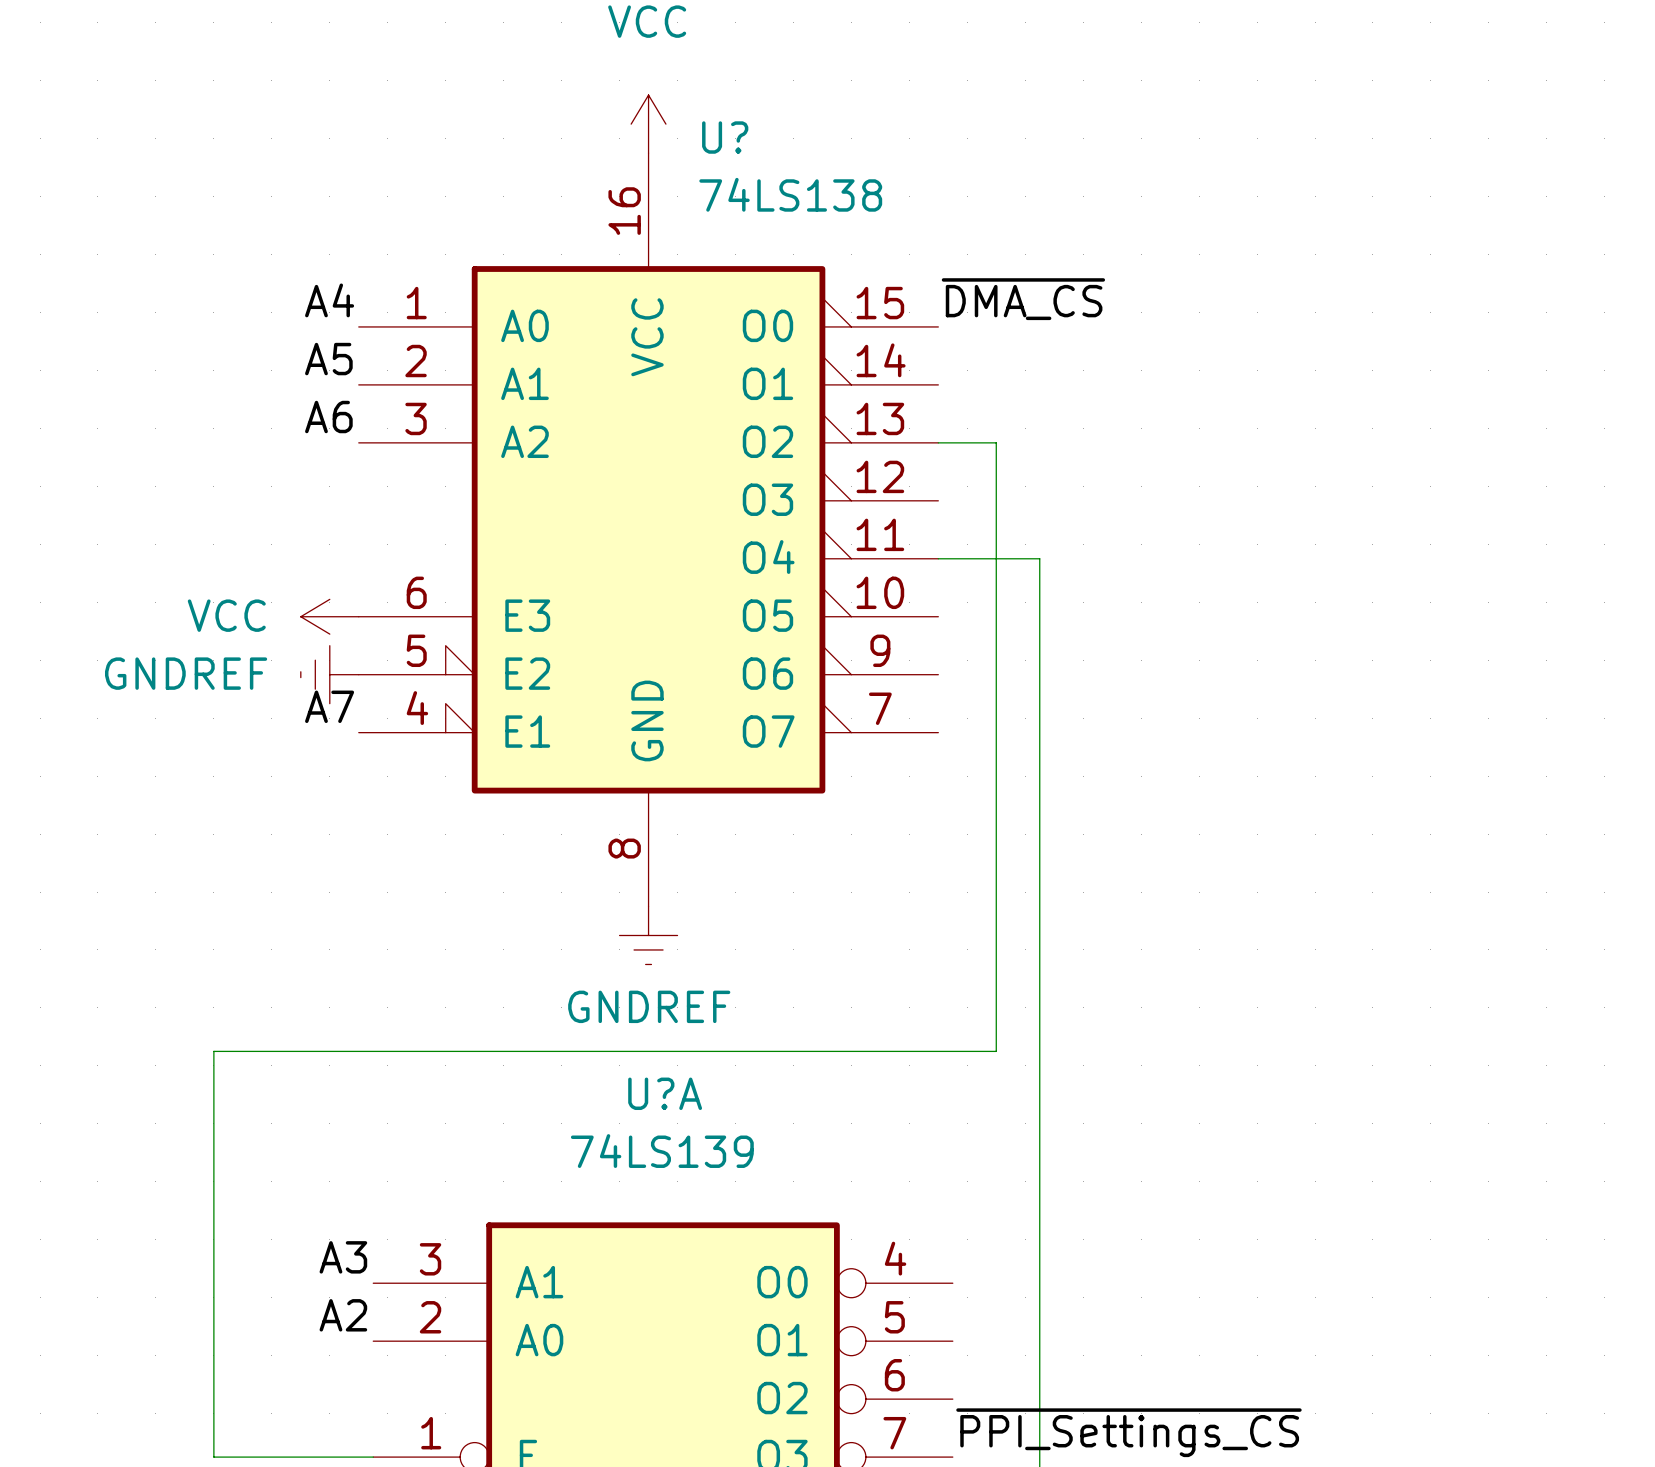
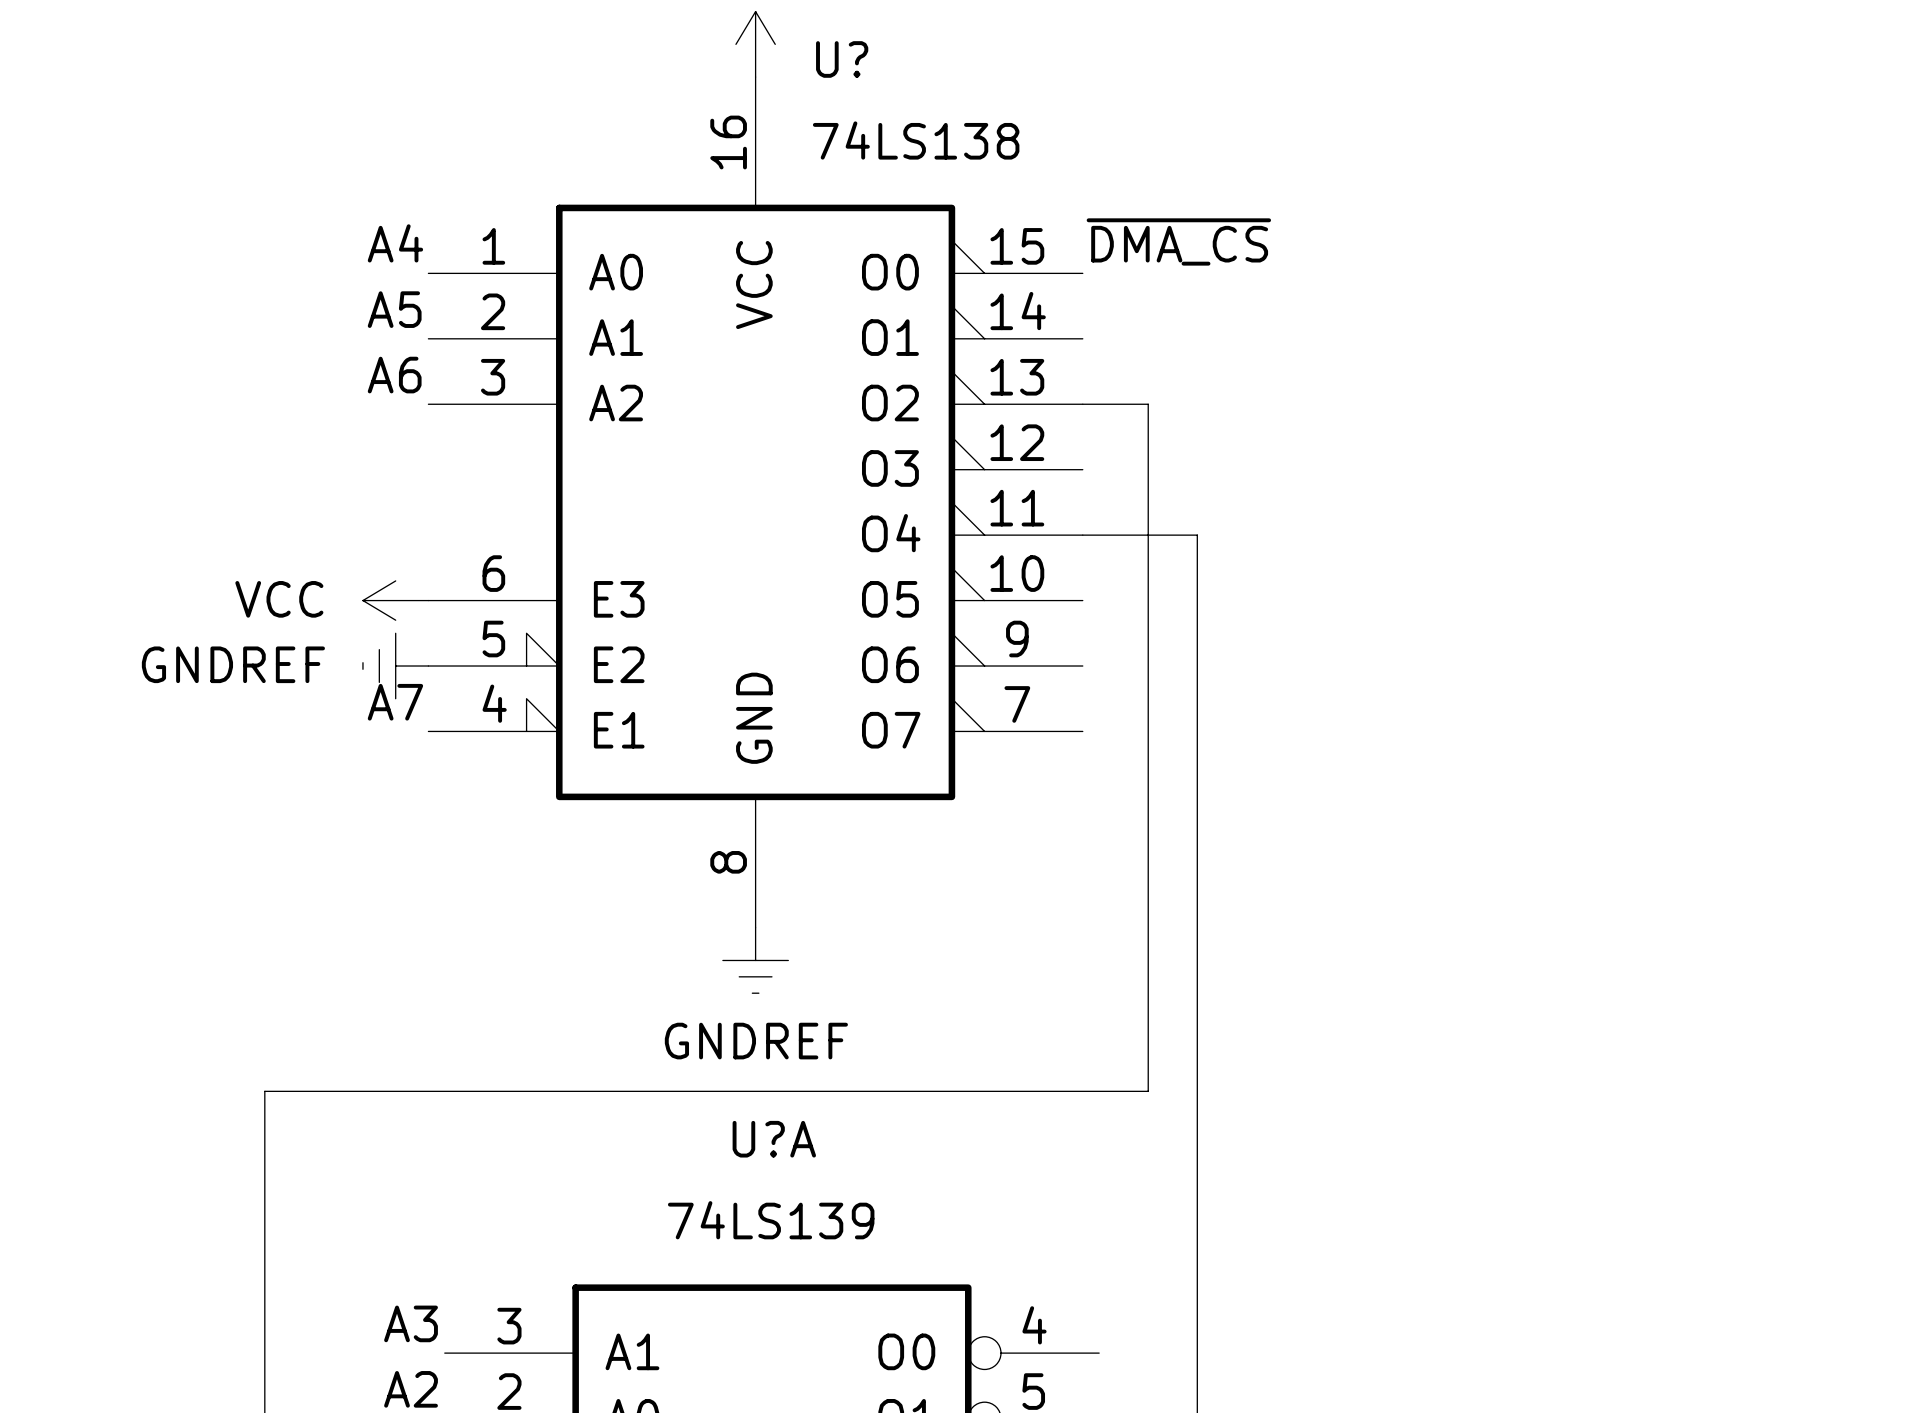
U? value position: 74LS138 (790, 194) -> 74LS138 (916, 140)
U?A value position: 74LS139 (662, 1151) -> 74LS139 (771, 1220)

